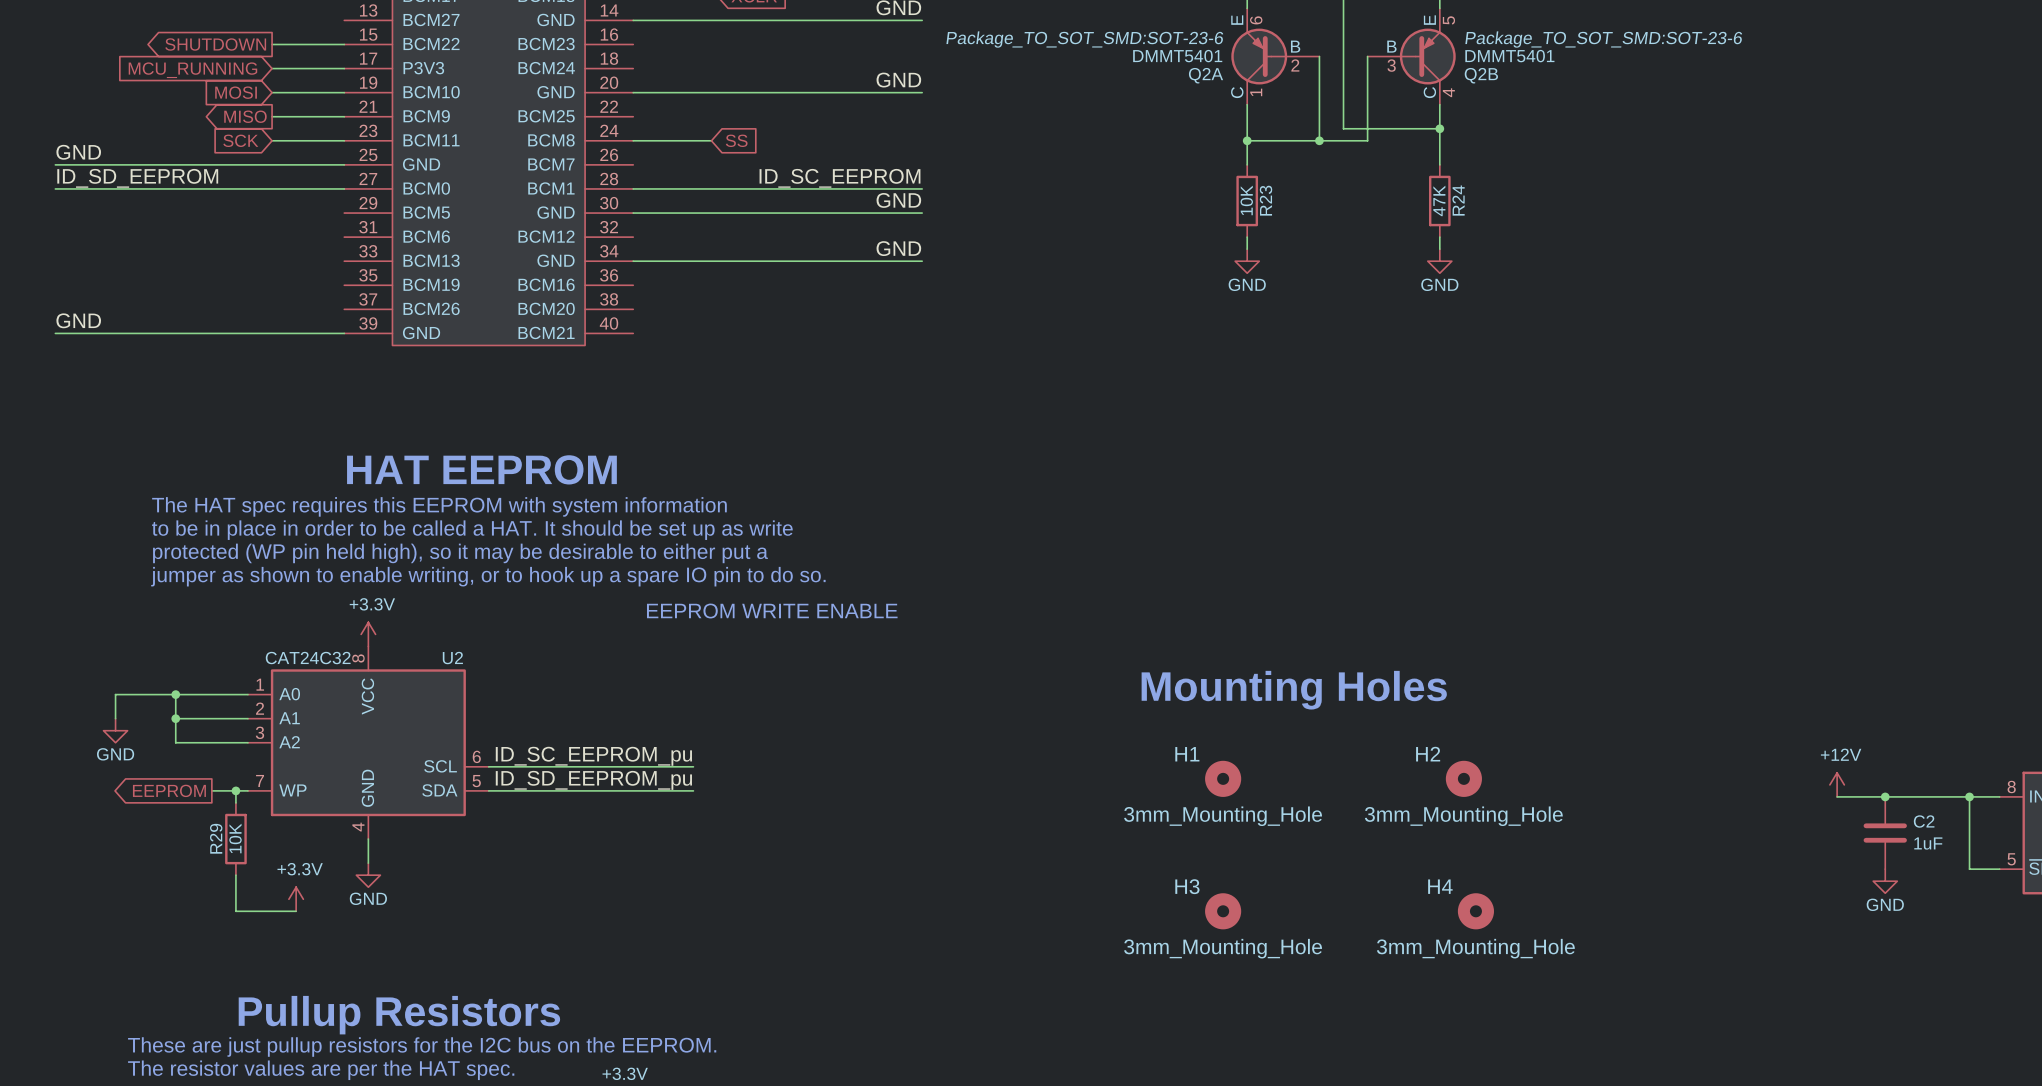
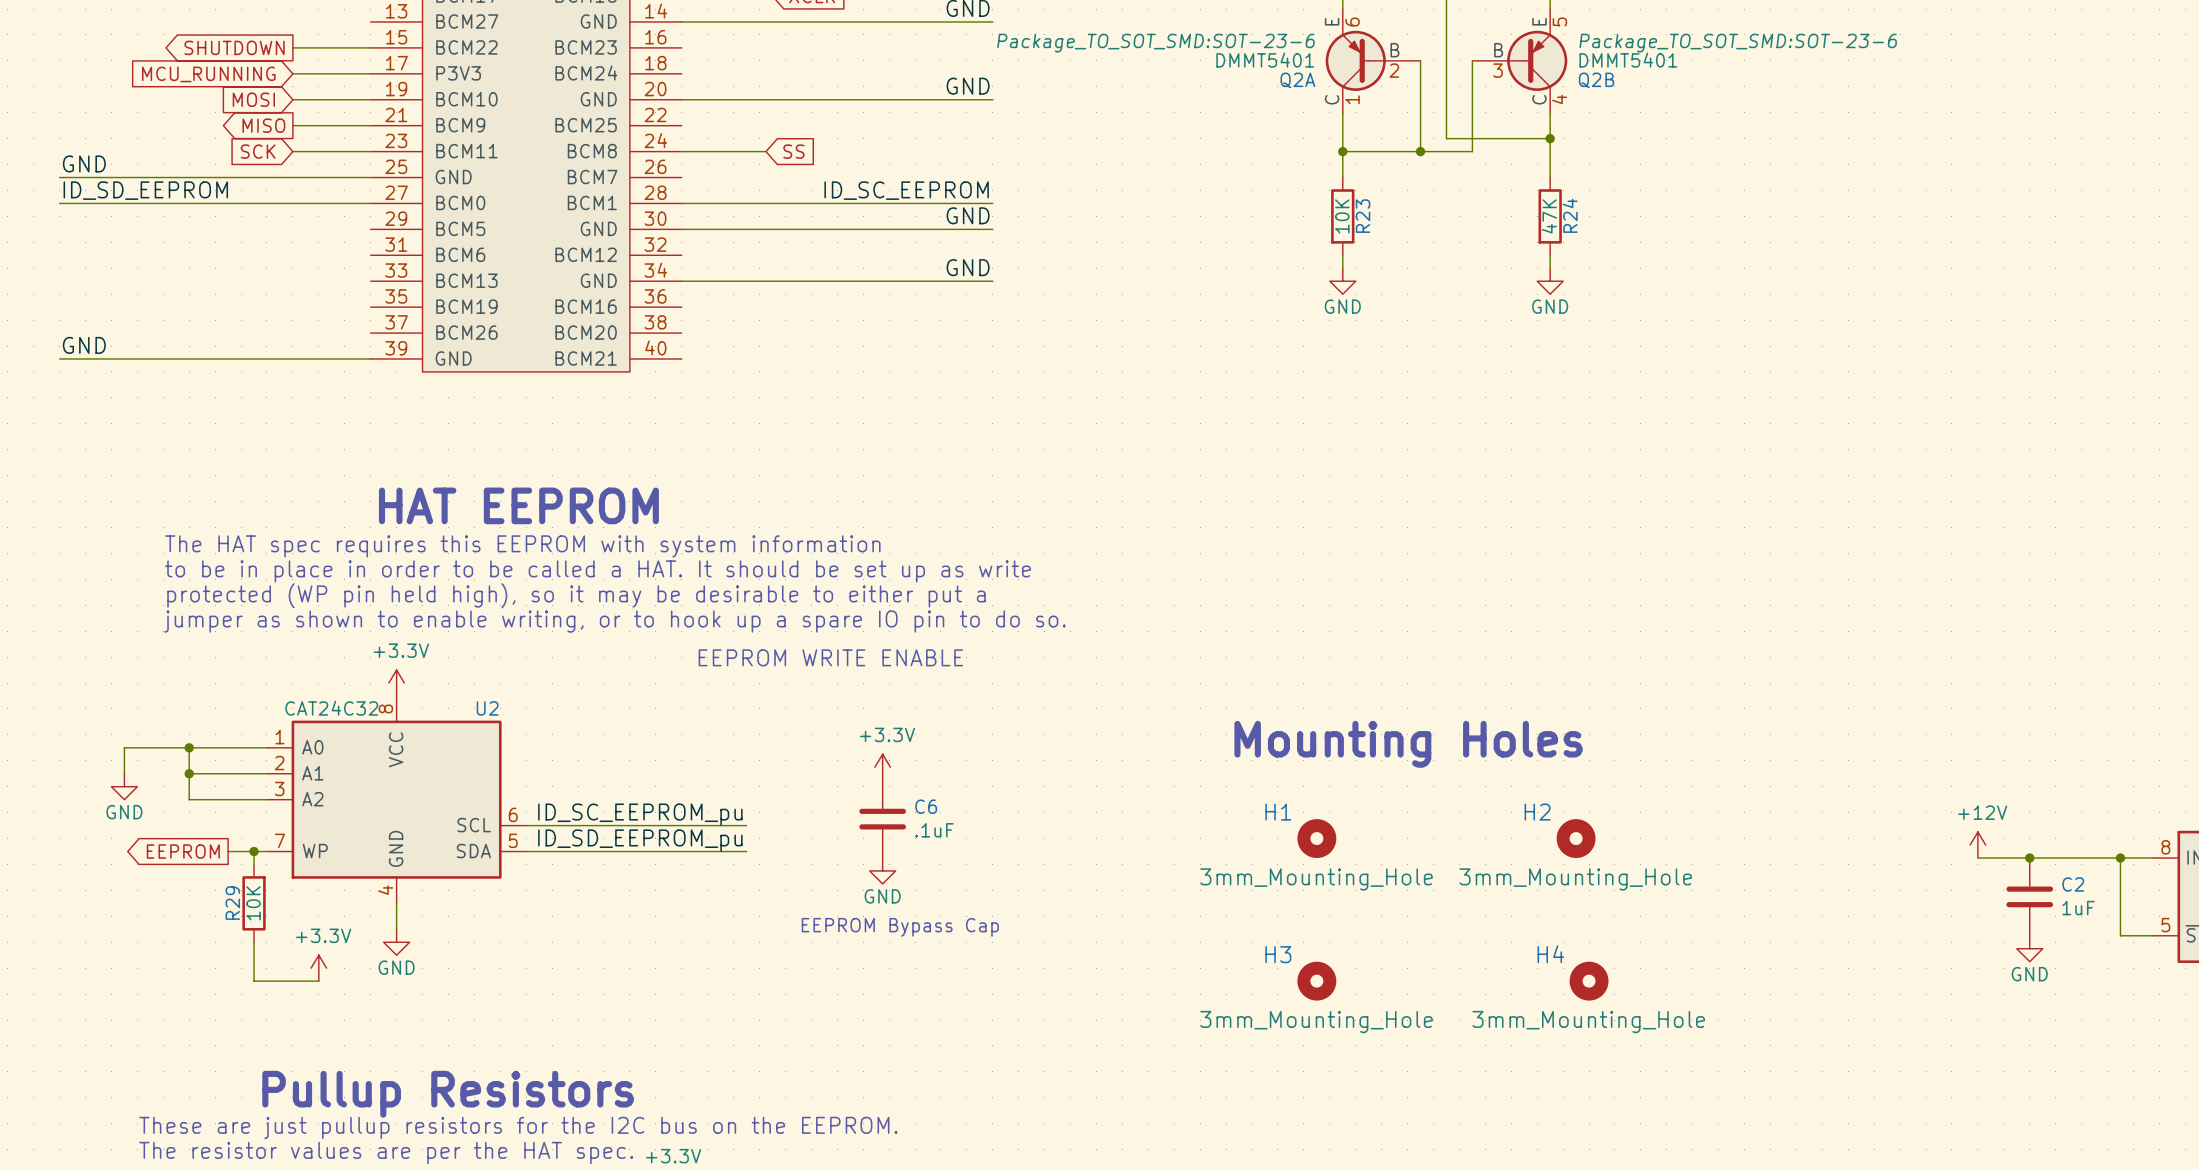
power symbol: none -> +3.3V (882, 767)
C6: none -> .1uF (882, 819)
power symbol: none -> GND (882, 870)
text: none -> EEPROM Bypass Cap (900, 927)

